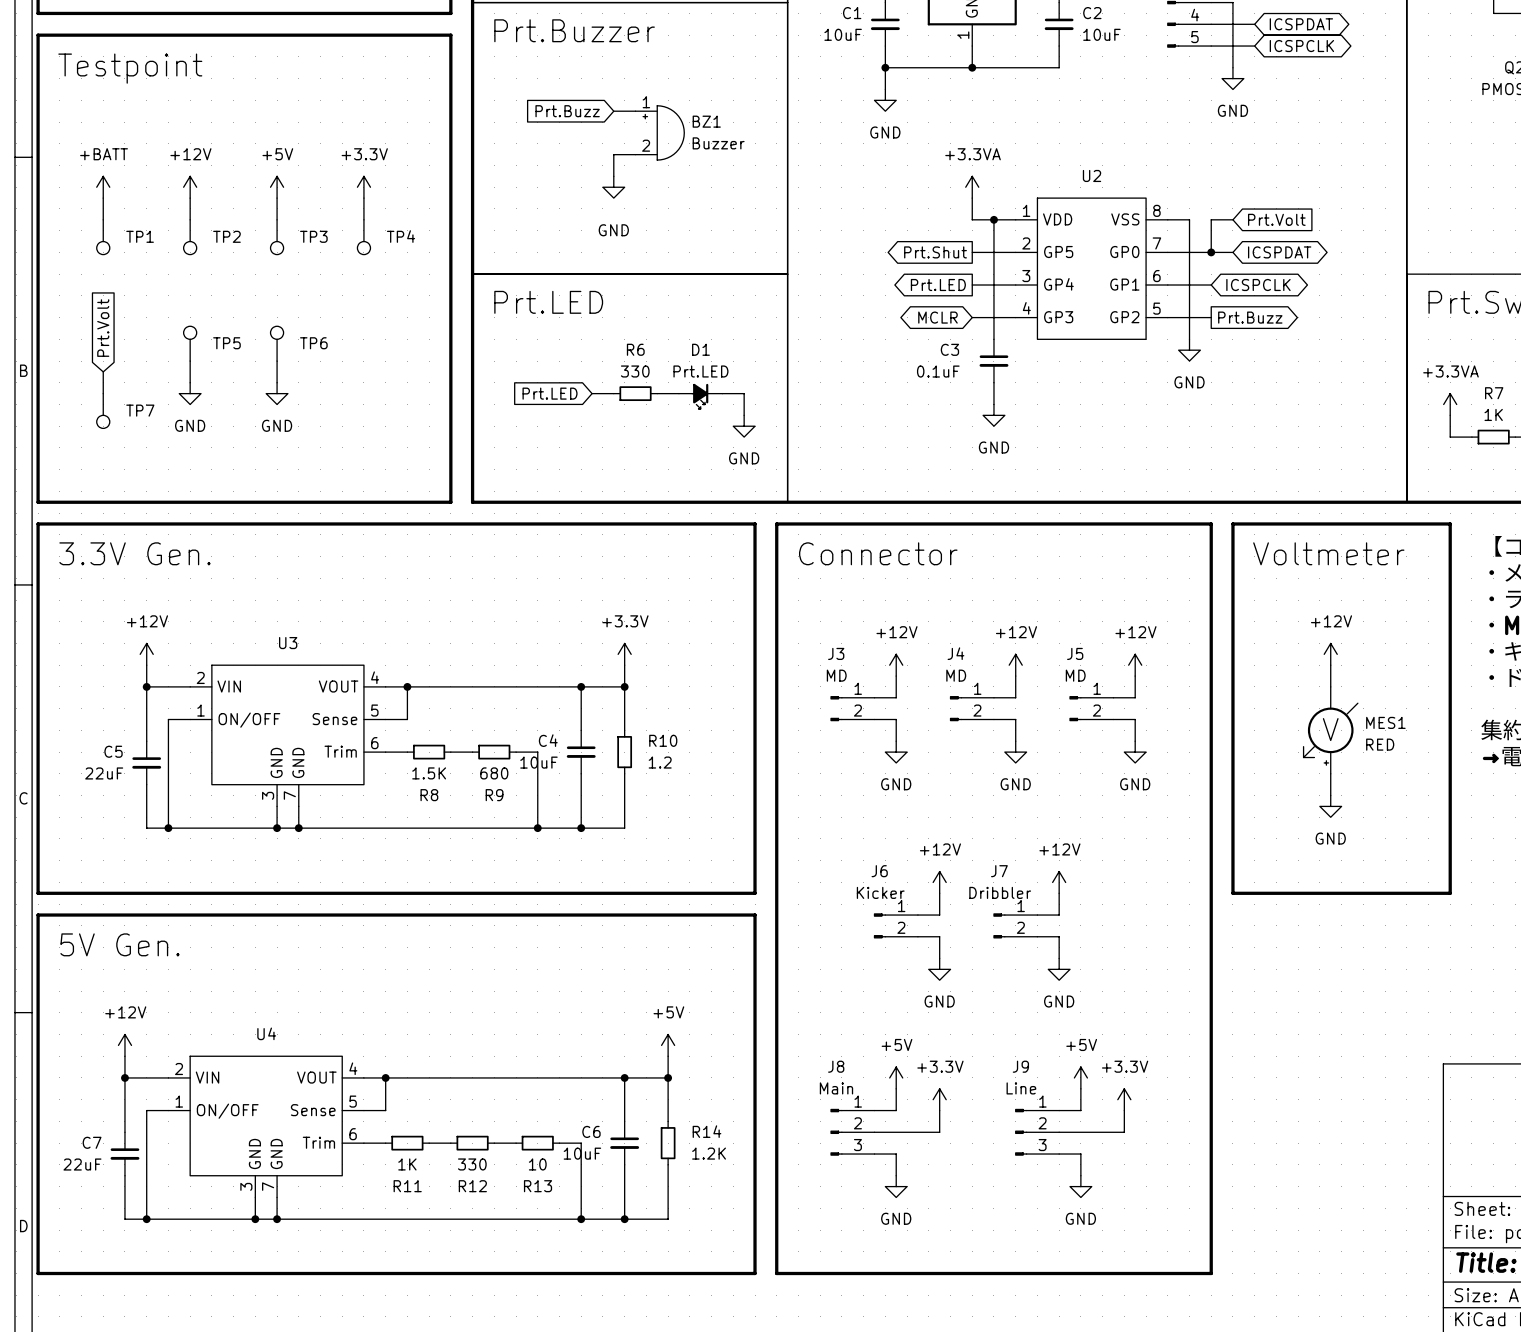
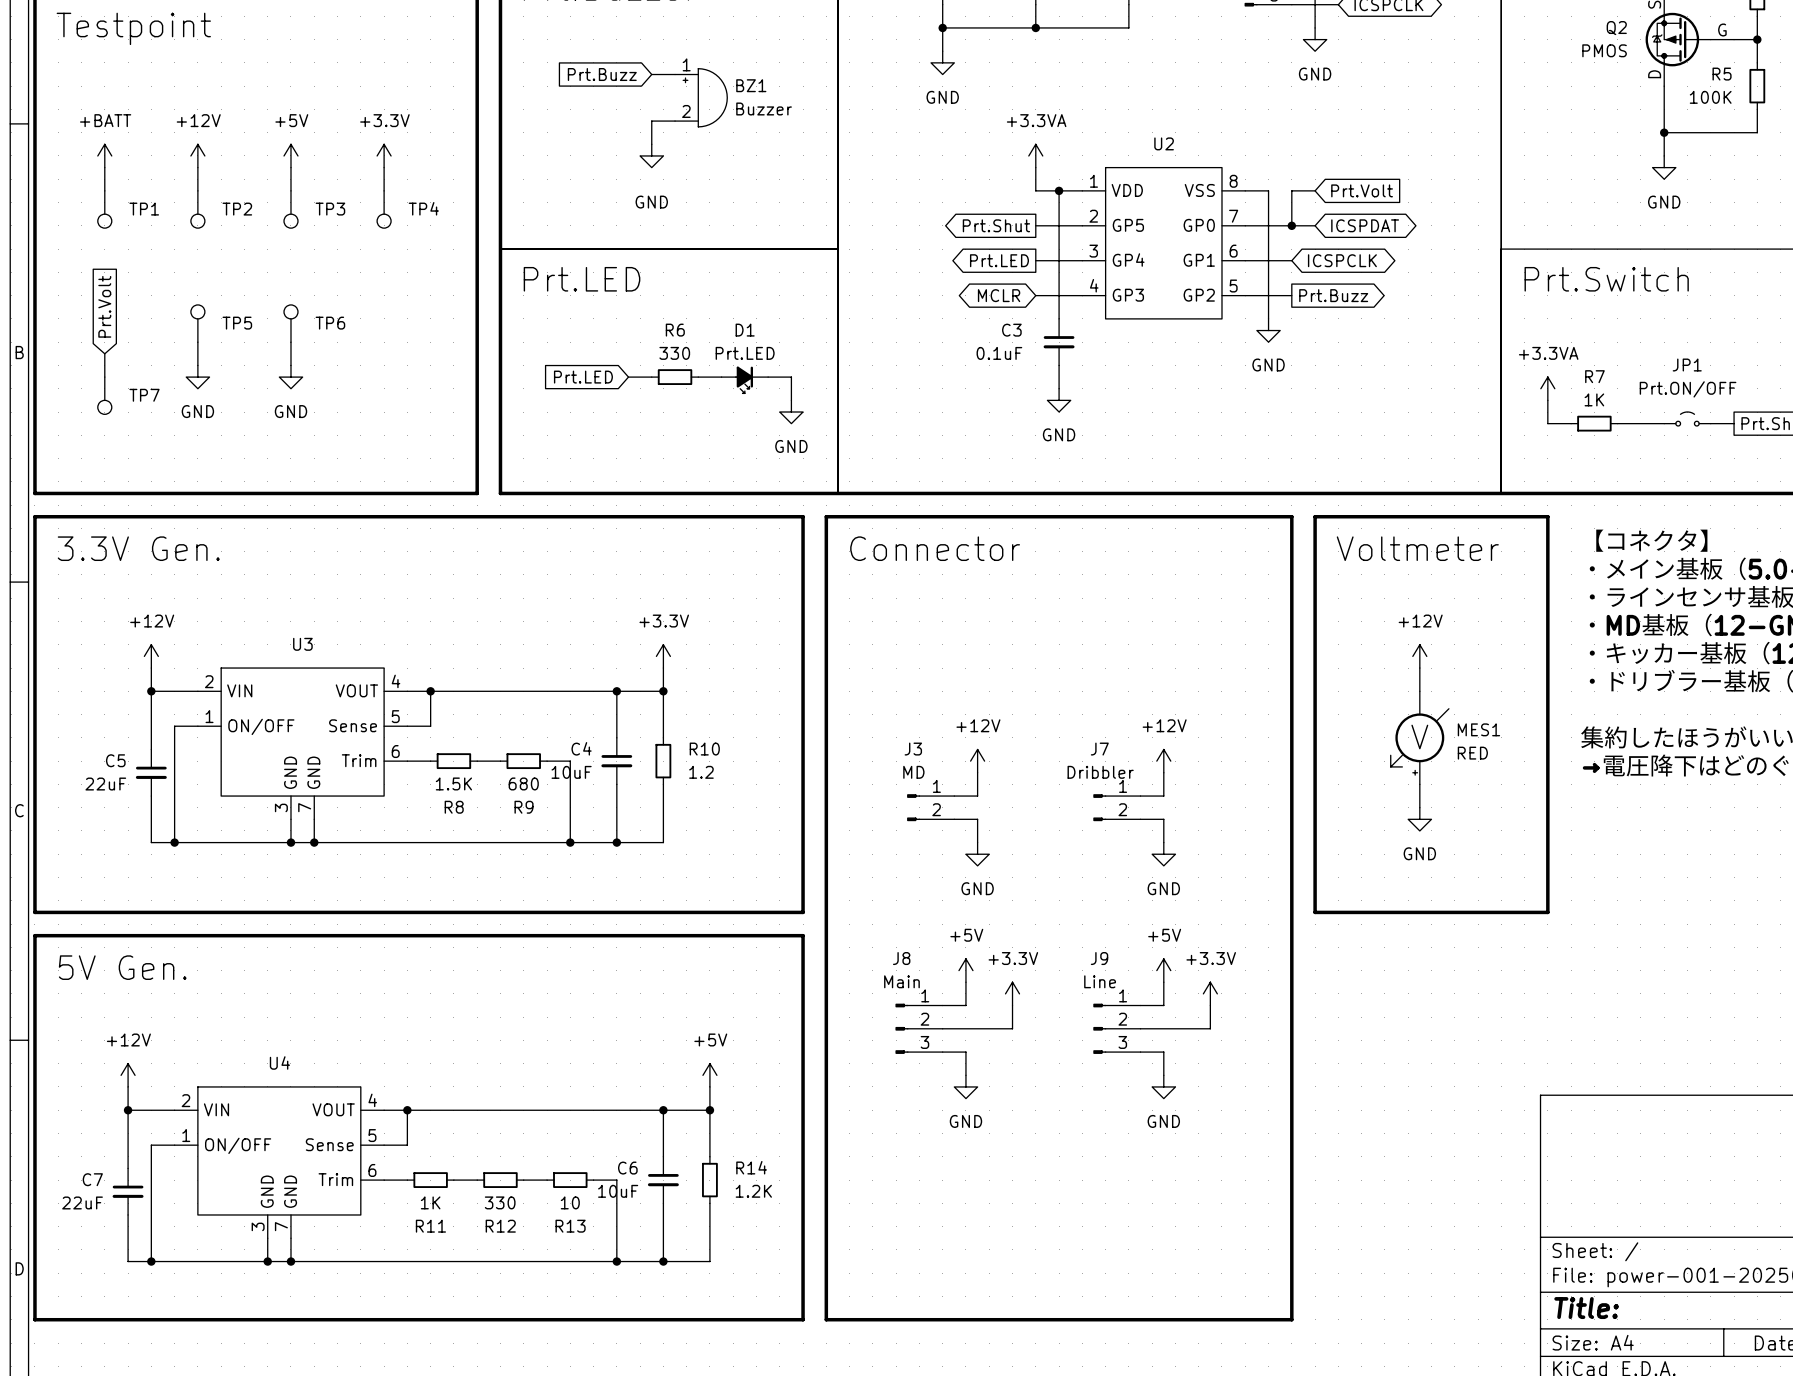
power symbol: +12V (896, 665) -> none
power symbol: +12V (1015, 665) -> none
power symbol: +12V (1135, 665) -> none
wire: (896, 676) (896, 697) (874, 697) -> (977, 772) (977, 796) (954, 796)
wire: (1015, 676) (1015, 697) (993, 697) -> none
wire: (1135, 676) (1135, 697) (1113, 697) -> (1163, 772) (1163, 796) (1140, 796)
J3 position: (852, 708) -> (930, 807)
J4: MD (971, 708) -> none
J5: MD (1091, 708) -> none
wire: (874, 719) (896, 719) (896, 741) -> (954, 819) (977, 819) (977, 842)
wire: (993, 719) (1015, 719) (1015, 741) -> none
wire: (1113, 719) (1135, 719) (1135, 741) -> (1140, 819) (1163, 819) (1163, 842)
power symbol: GND (896, 752) -> none
power symbol: none -> +12V (977, 761)
power symbol: GND (1015, 752) -> none
power symbol: none -> +12V (1163, 761)
power symbol: GND (1135, 752) -> none
power symbol: none -> GND (977, 854)
power symbol: none -> GND (1163, 854)
power symbol: +12V (939, 882) -> none
power symbol: +12V (1059, 882) -> none
wire: (939, 893) (939, 915) (917, 915) -> none
wire: (1059, 893) (1059, 915) (1037, 915) -> none
J6: Kicker (895, 925) -> none
J7 position: (1015, 925) -> (1116, 807)
wire: (917, 936) (939, 936) (939, 958) -> none
wire: (1037, 936) (1059, 936) (1059, 958) -> none
power symbol: none -> +5V (965, 970)
power symbol: none -> +5V (1163, 970)
power symbol: GND (939, 969) -> none
power symbol: none -> +3.3V (1012, 993)
power symbol: GND (1059, 969) -> none
power symbol: none -> +3.3V (1210, 993)
power symbol: none -> GND (965, 1086)
power symbol: none -> GND (1163, 1086)
power symbol: +5V (896, 1077) -> none
power symbol: +5V (1080, 1077) -> none
wire: (896, 1088) (896, 1110) (874, 1110) -> (965, 982) (965, 1005) (942, 1005)
wire: (1080, 1088) (1080, 1110) (1059, 1110) -> (1163, 982) (1163, 1005) (1140, 1005)
power symbol: +3.3V (939, 1099) -> none
power symbol: +3.3V (1124, 1099) -> none
wire: (939, 1110) (939, 1132) (874, 1132) -> (1012, 1005) (1012, 1028) (942, 1028)
wire: (1124, 1110) (1124, 1132) (1059, 1132) -> (1210, 1005) (1210, 1028) (1140, 1028)
J8 position: (852, 1132) -> (919, 1028)
J9 position: (1037, 1132) -> (1116, 1028)
wire: (874, 1154) (896, 1154) (896, 1175) -> (942, 1052) (965, 1052) (965, 1075)
wire: (1059, 1154) (1080, 1154) (1080, 1175) -> (1140, 1052) (1163, 1052) (1163, 1075)
power symbol: GND (896, 1186) -> none
power symbol: GND (1080, 1186) -> none

